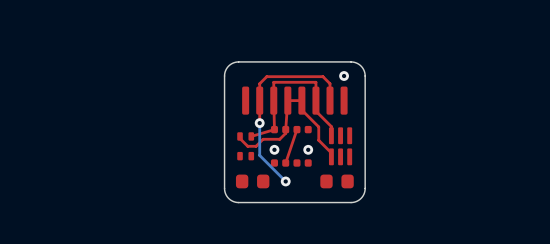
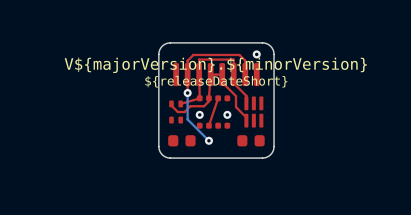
text: none -> V${majorVersion}.${minorVersion} (215, 65)
text: none -> ${releaseDateShort} (216, 81)

